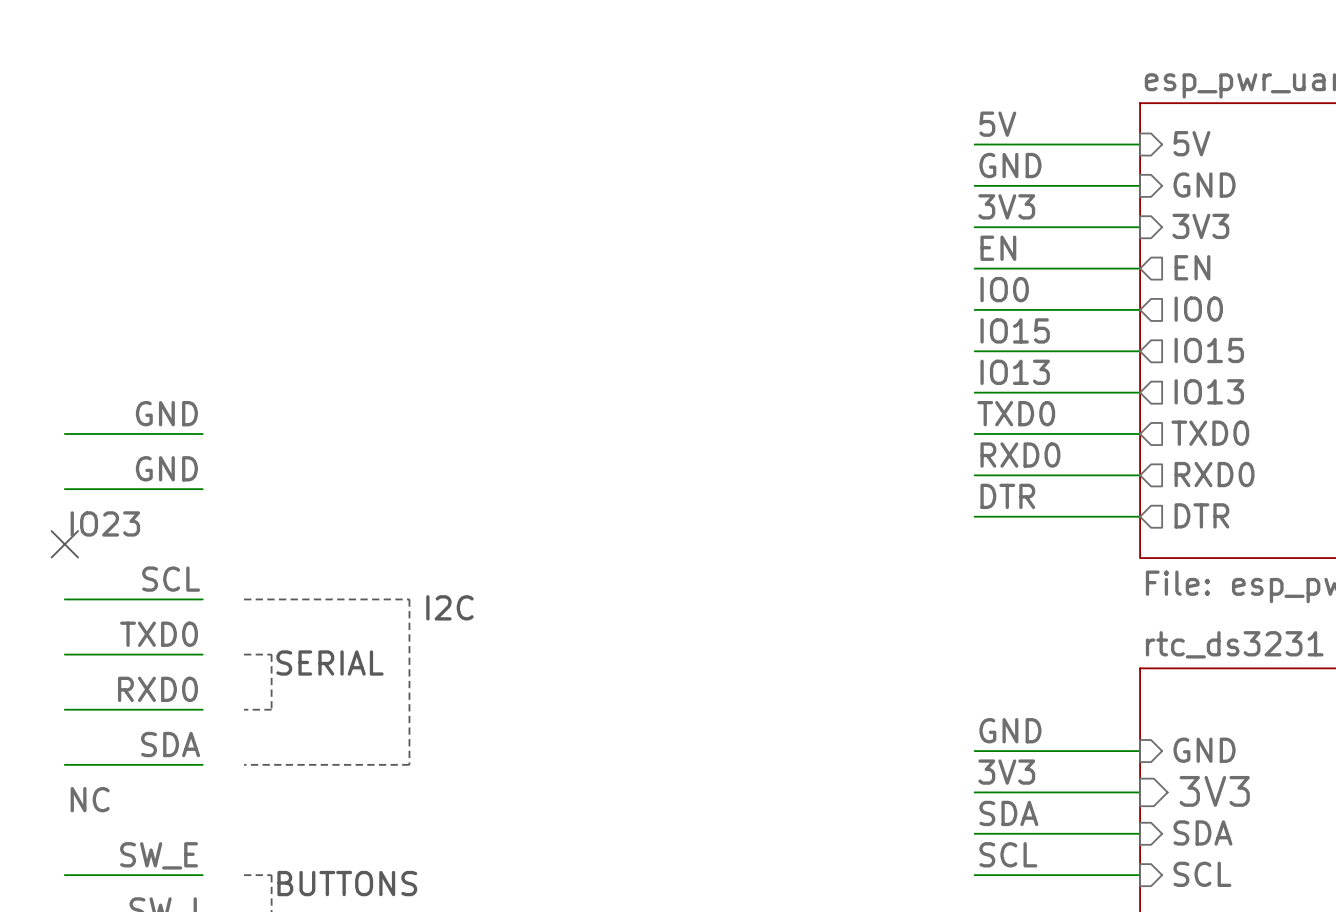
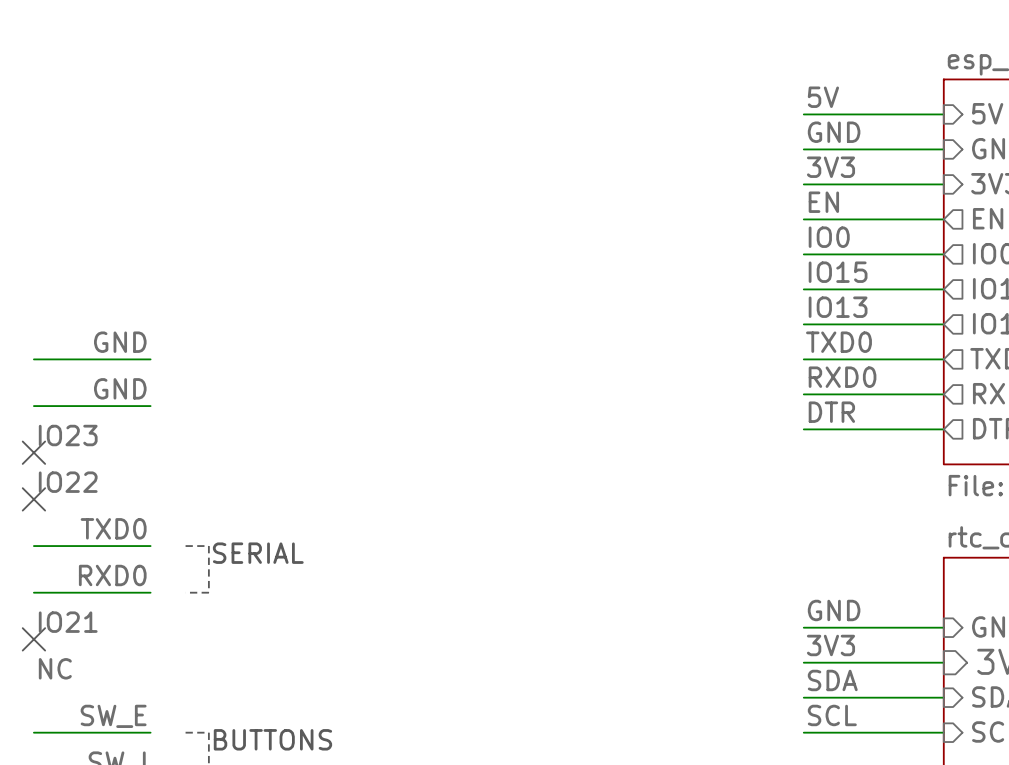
label: none -> IO22 (68, 482)
label: SCL (171, 579) -> none
wire: (64, 599) (202, 599) -> none
no-connect mark: none -> (33, 499)
line: (244, 599) (409, 599) (409, 764) (244, 764) -> none
text: I2C (449, 607) -> none
label: none -> IO21 (68, 622)
label: SDA (170, 744) -> none
wire: (64, 764) (202, 764) -> none
no-connect mark: none -> (33, 639)

